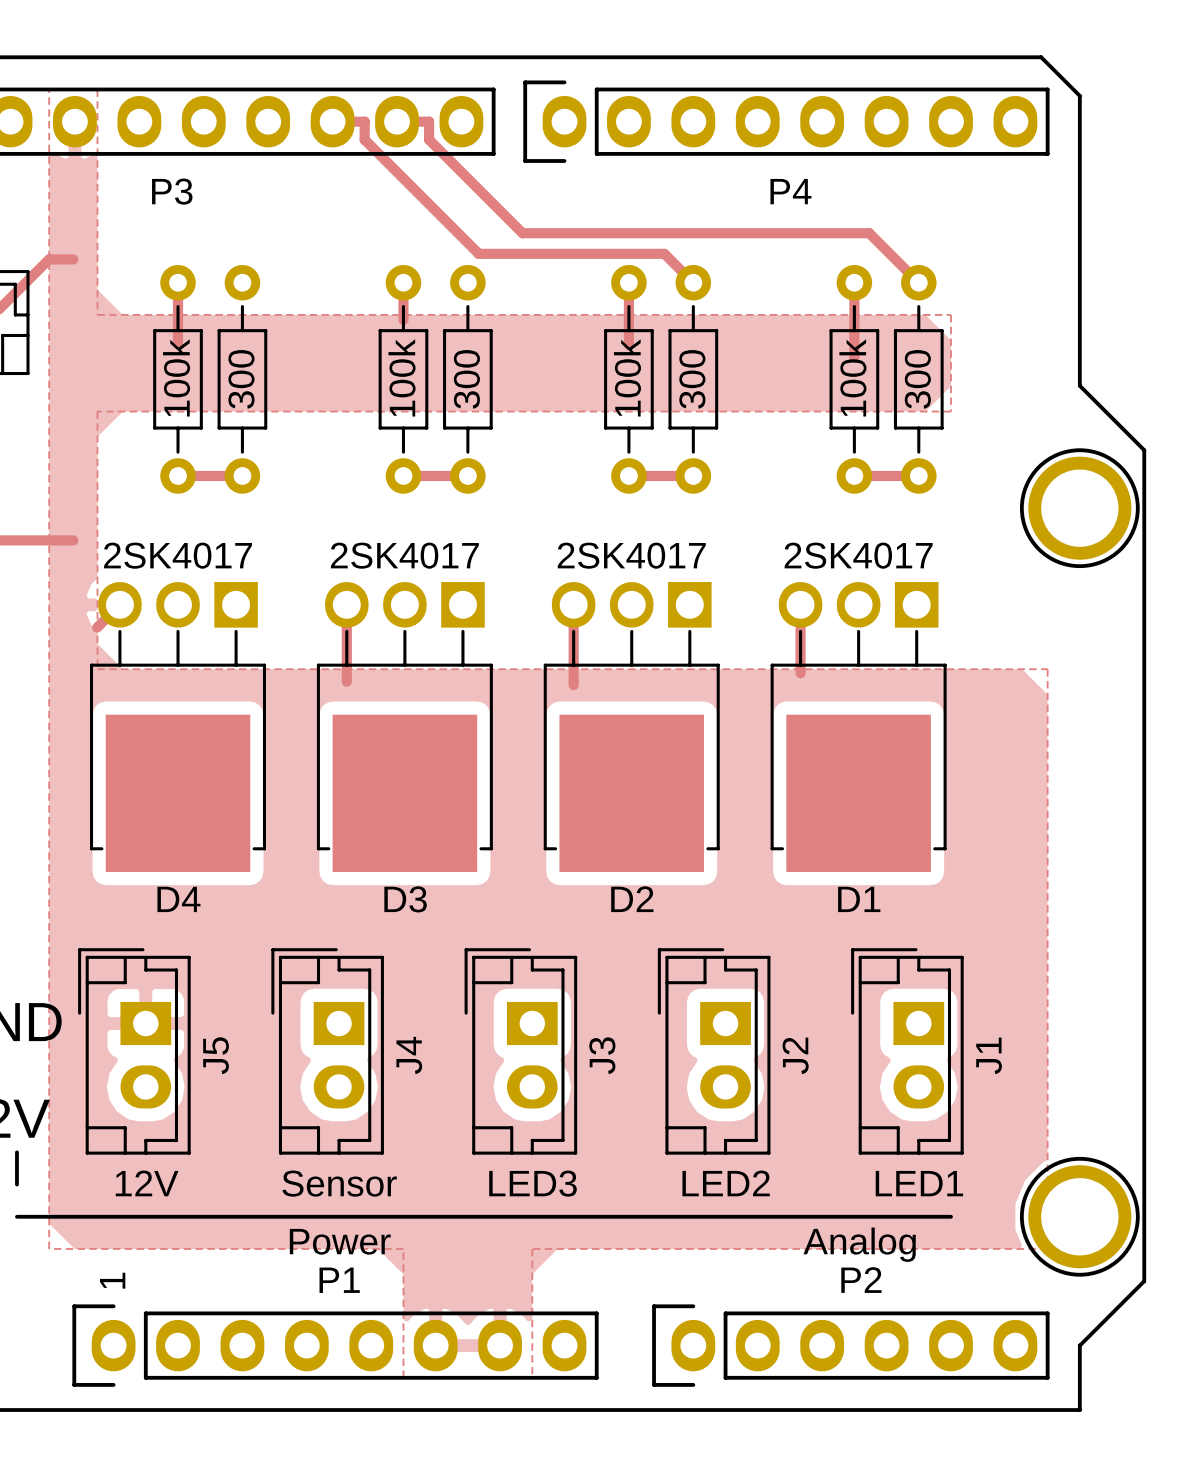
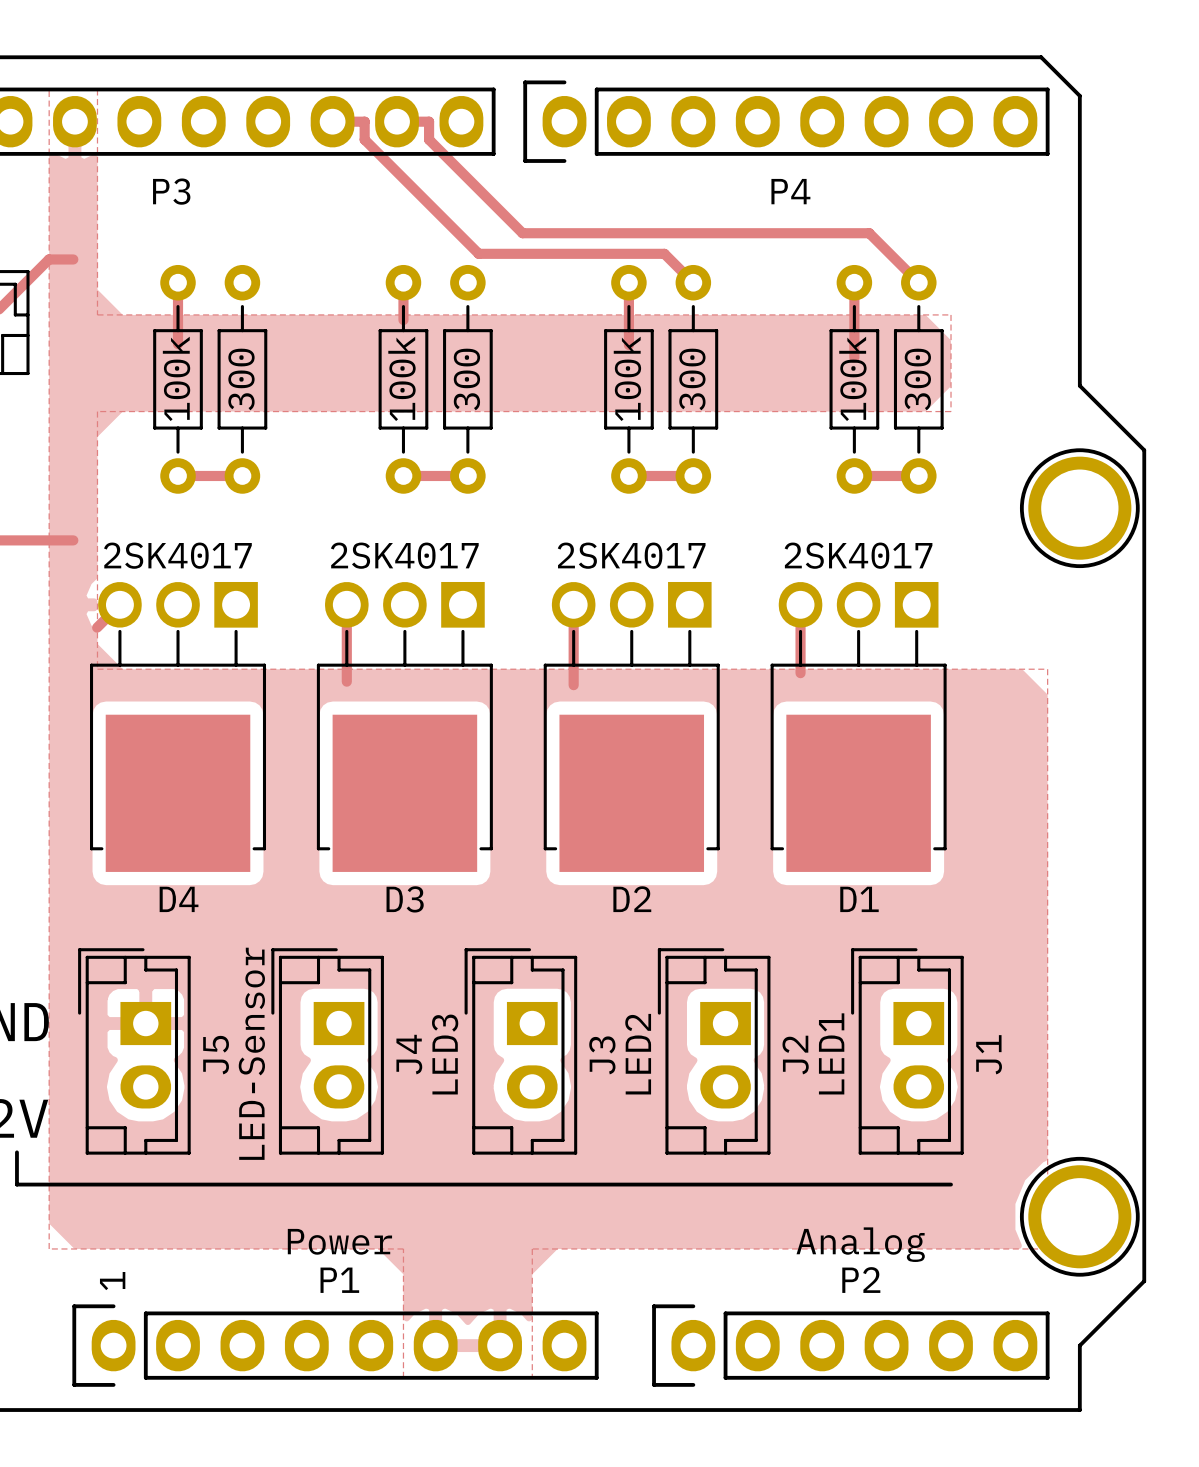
J5 value: 12V (147, 1183) -> none
J4 value: Sensor (339, 1183) -> LED-Sensor (251, 1053)
J3 value rotation: 0° (533, 1183) -> 90° counterclockwise (445, 1054)
J3 value position: LED3 (533, 1183) -> LED3 (445, 1054)
J2 value rotation: 0° (726, 1183) -> 90° counterclockwise (638, 1054)
J2 value position: LED2 (726, 1183) -> LED2 (638, 1054)
J1 value rotation: 0° (919, 1183) -> 90° counterclockwise (831, 1053)
J1 value position: LED1 (919, 1183) -> LED1 (831, 1053)
line: (16, 1216) (951, 1216) -> (16, 1184) (951, 1184)

